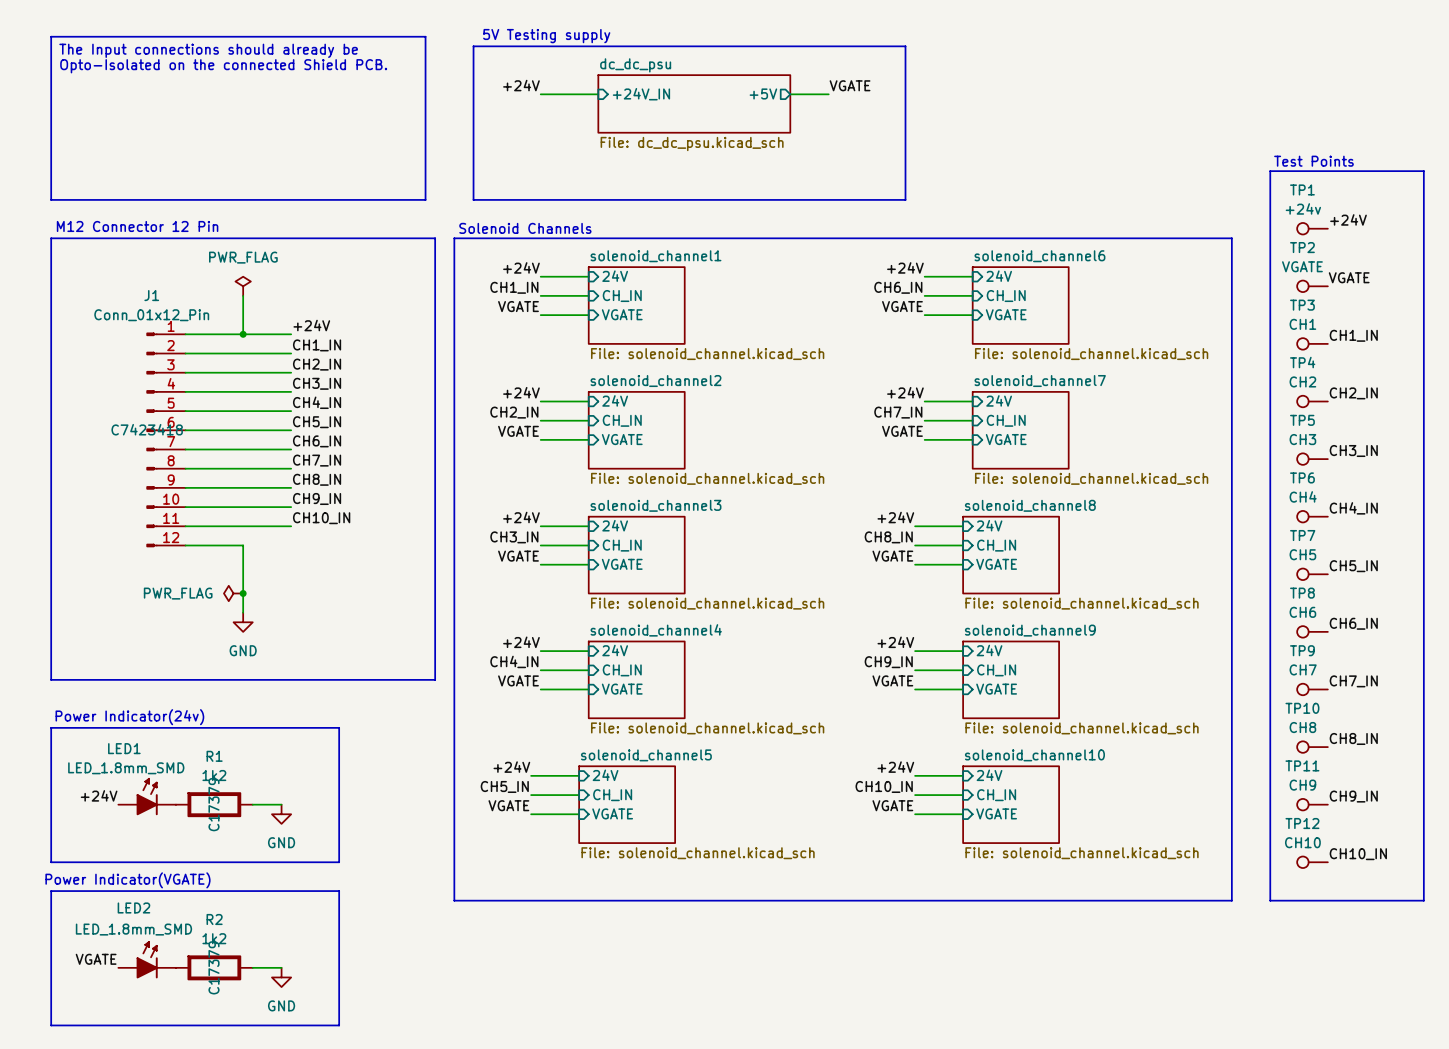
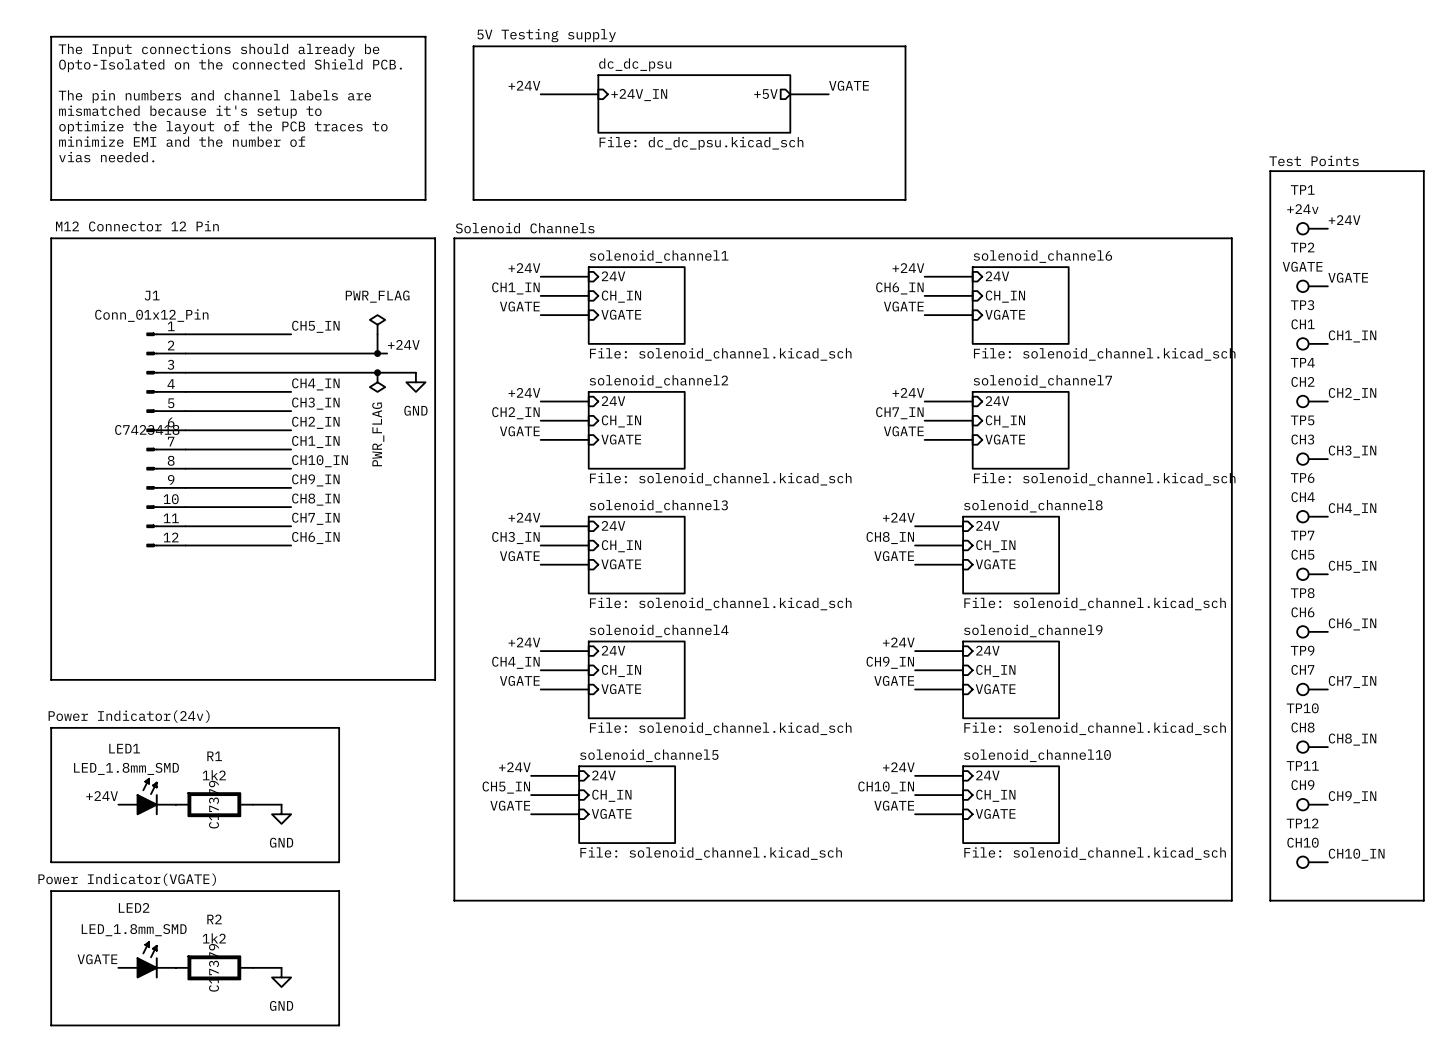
text: none -> The pin numbers and channel labels are (214, 96)
text: none -> mismatched because it's setup to (190, 112)
text: none -> optimize the layout of the PCB traces to (223, 127)
text: none -> minimize EMI and the number of (182, 141)
text: none -> vias needed. (106, 157)
power symbol: PWR_FLAG (243, 286) -> none
wire: (243, 295) (243, 334) -> none
power symbol: none -> PWR_FLAG (377, 324)
label: +24V (311, 325) -> CH5_IN (315, 326)
junction: (243, 334) -> none
wire: none -> (377, 334) (377, 353)
label: none -> +24V (403, 344)
label: CH1_IN (317, 345) -> none
wire: none -> (291, 353) (387, 353)
junction: none -> (377, 353)
label: CH2_IN (317, 364) -> none
wire: none -> (291, 372) (415, 372)
junction: none -> (377, 372)
power symbol: none -> PWR_FLAG (377, 382)
power symbol: none -> GND (415, 382)
label: CH3_IN (317, 383) -> CH4_IN (315, 384)
label: CH4_IN (317, 402) -> CH3_IN (315, 403)
label: CH5_IN (317, 422) -> CH2_IN (315, 422)
label: CH6_IN (317, 441) -> CH1_IN (315, 442)
label: CH7_IN (317, 460) -> CH10_IN (319, 461)
label: CH8_IN (317, 479) -> CH9_IN (315, 480)
label: CH9_IN (317, 498) -> CH8_IN (315, 499)
label: CH10_IN (321, 518) -> CH7_IN (315, 518)
label: none -> CH6_IN (315, 538)
wire: (243, 545) (243, 612) -> (243, 545) (291, 545)
power symbol: PWR_FLAG (233, 593) -> none
junction: (243, 593) -> none
power symbol: GND (243, 622) -> none

